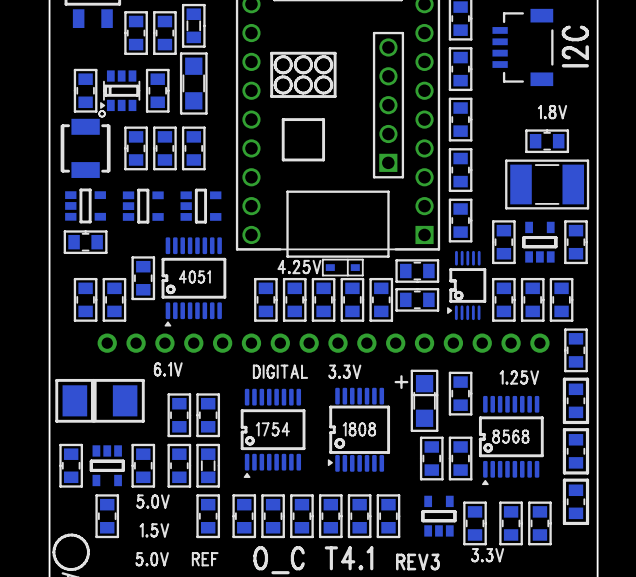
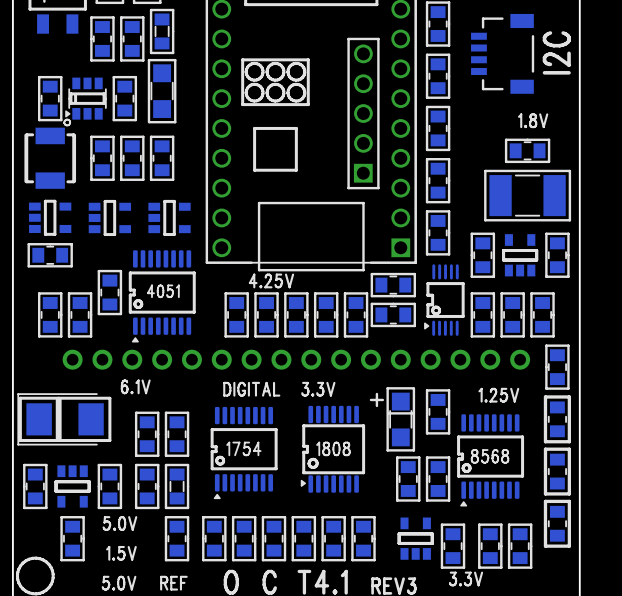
part: (342, 267) -> none
part footprint: [55, 378, 145, 423] -> [17, 393, 104, 446]
line: none -> (109, 398) (20, 398) (20, 440) (109, 440) (109, 398)
line: none -> (58, 399) (58, 439)

